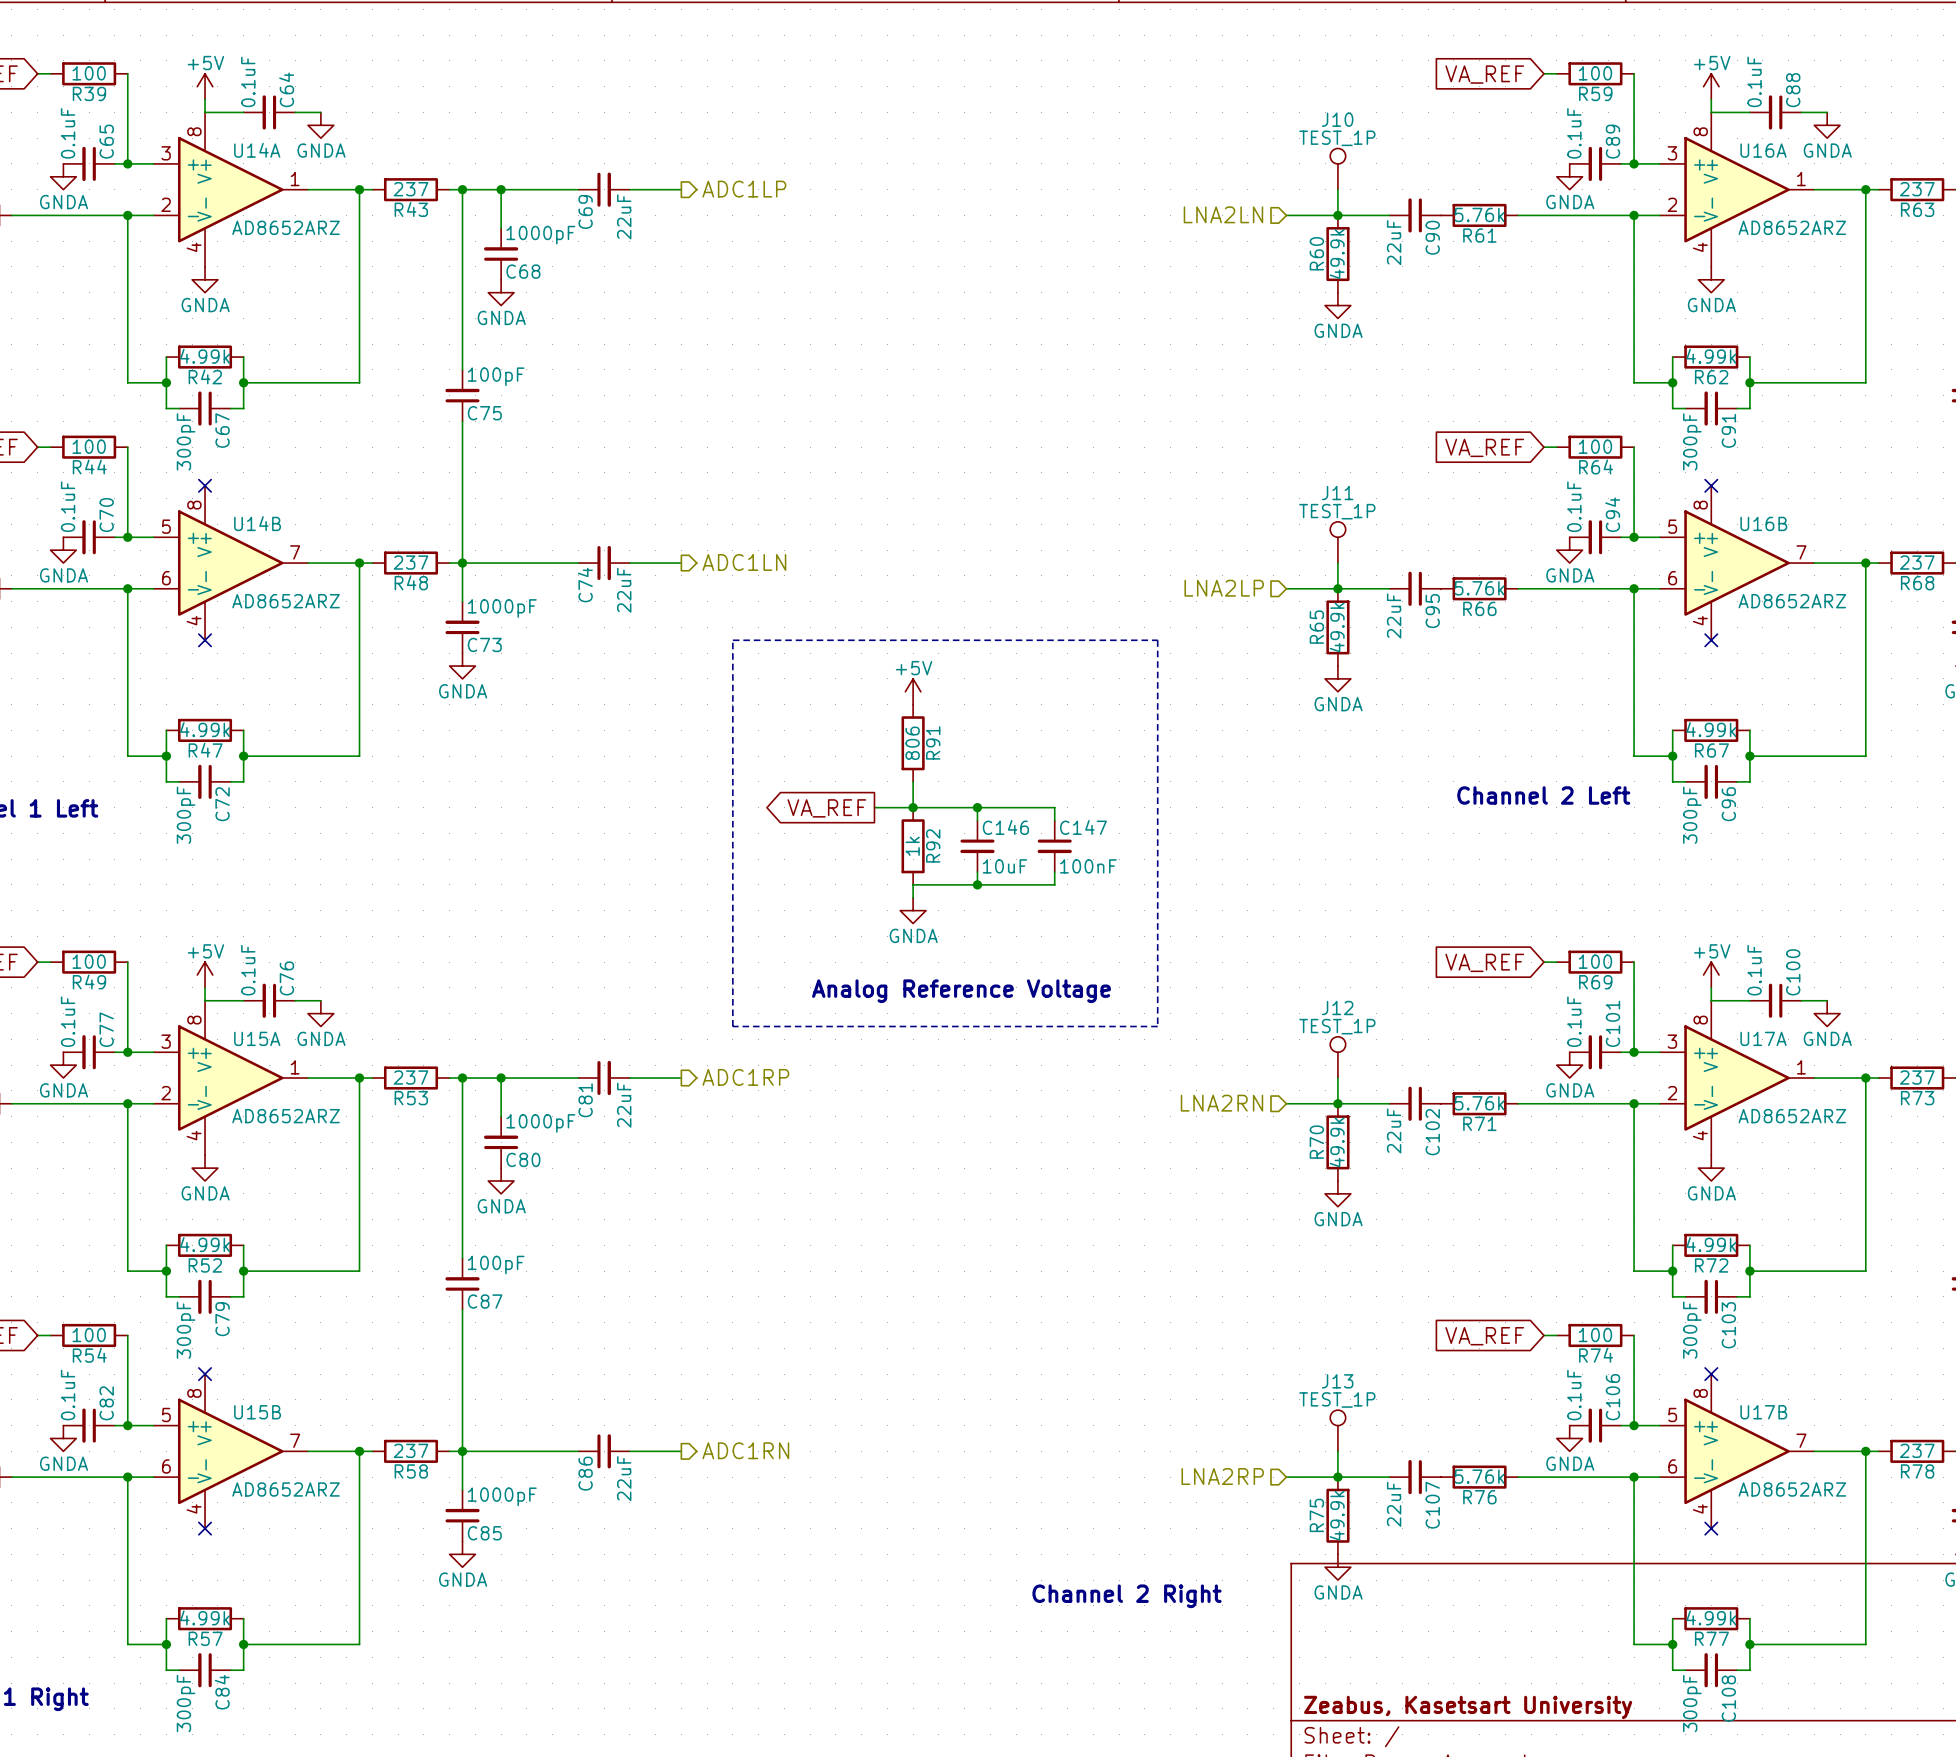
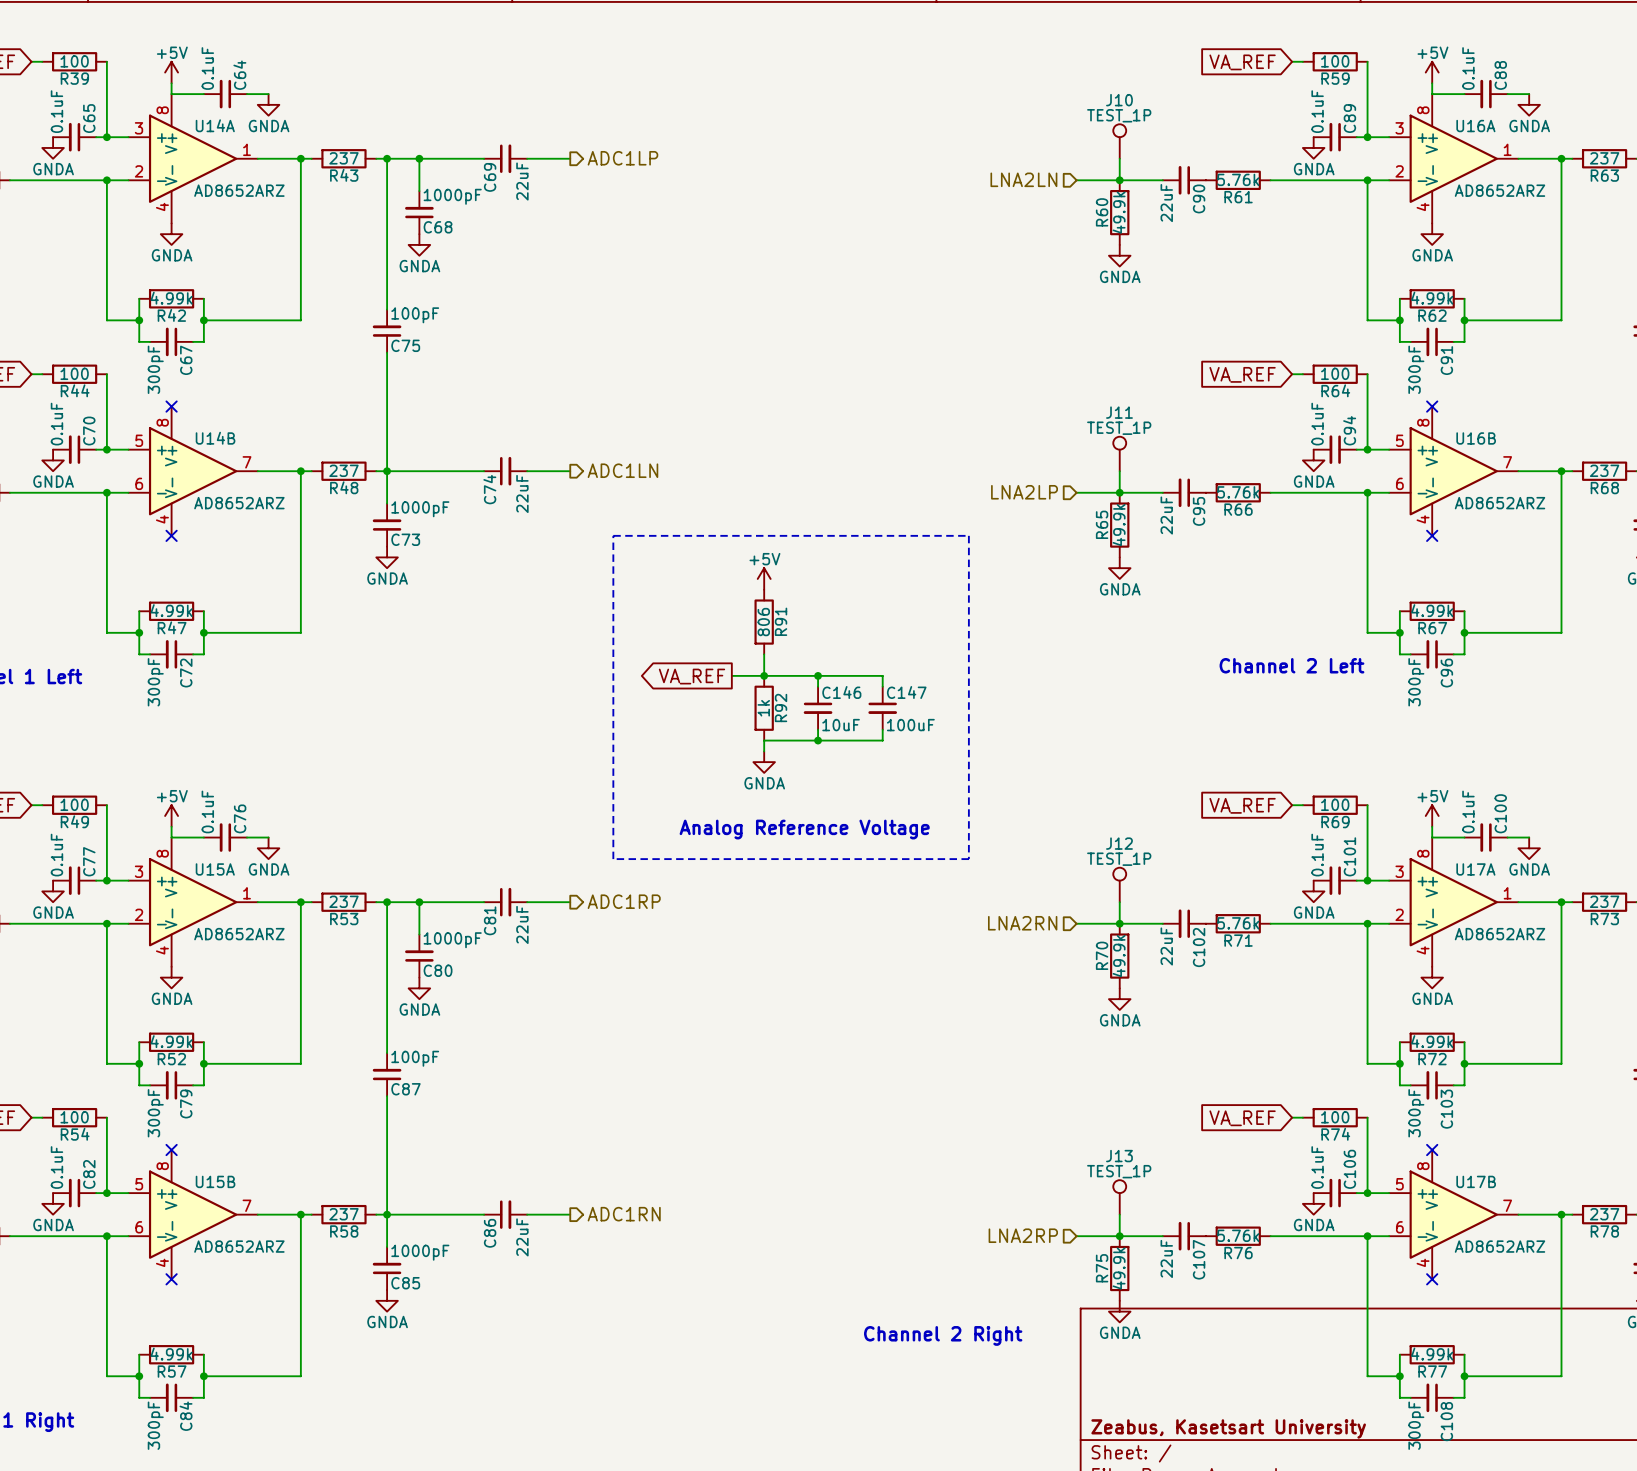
C147 value: 100nF (1088, 866) -> 100uF (910, 725)

